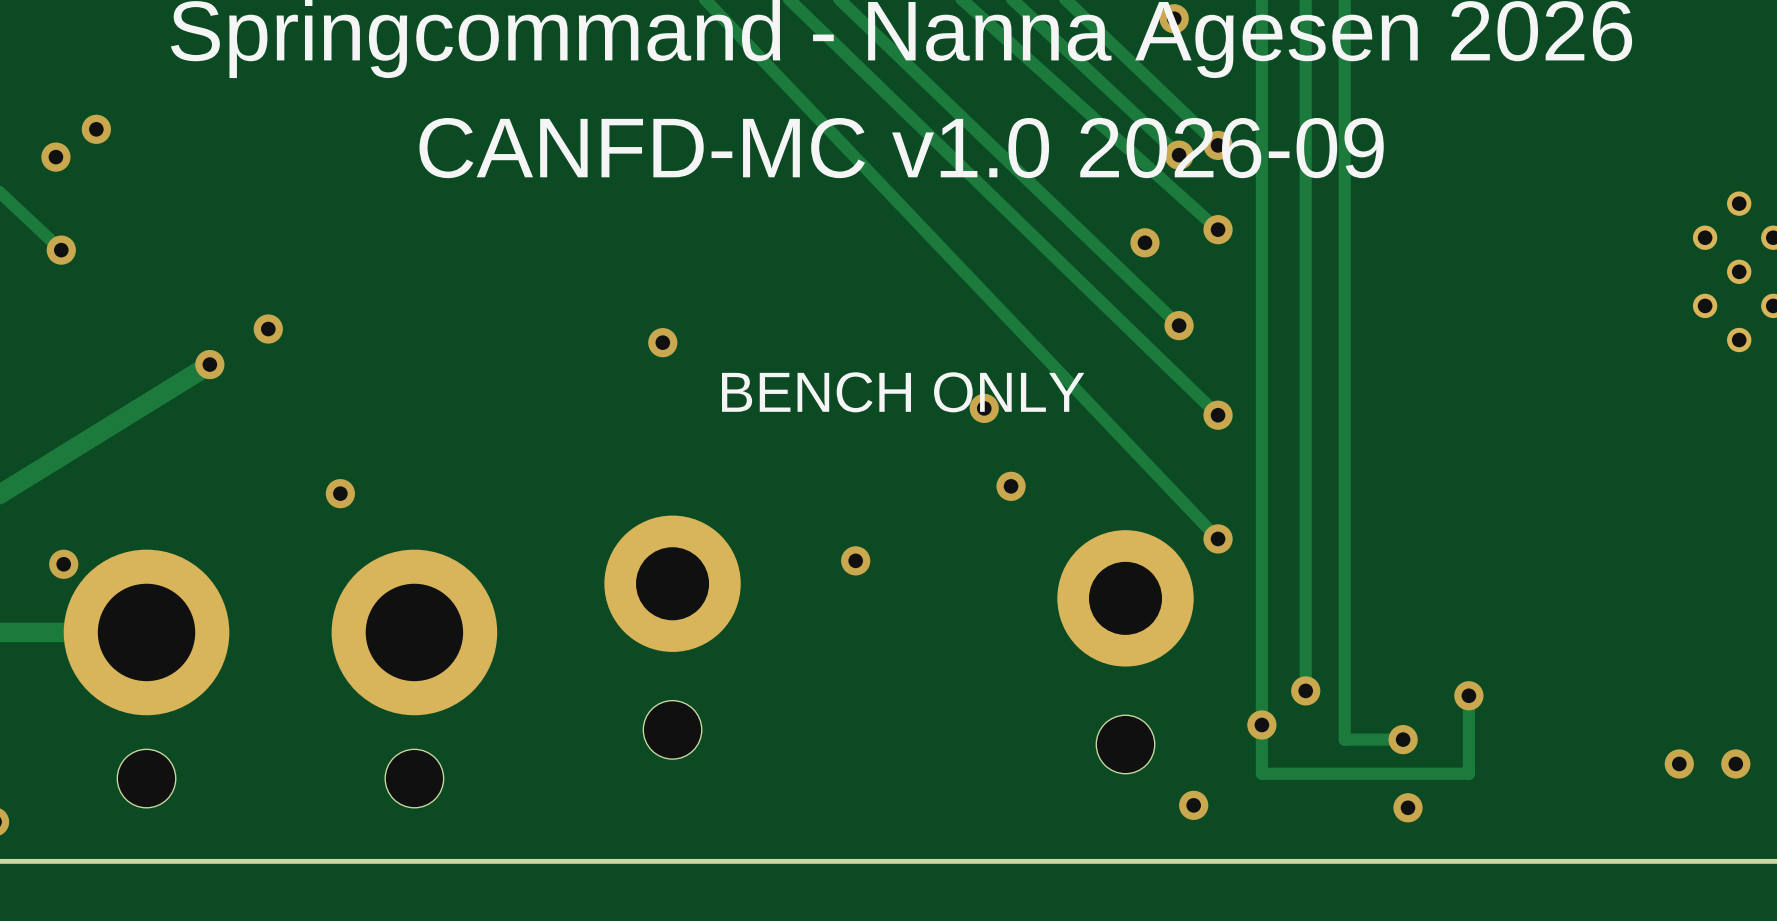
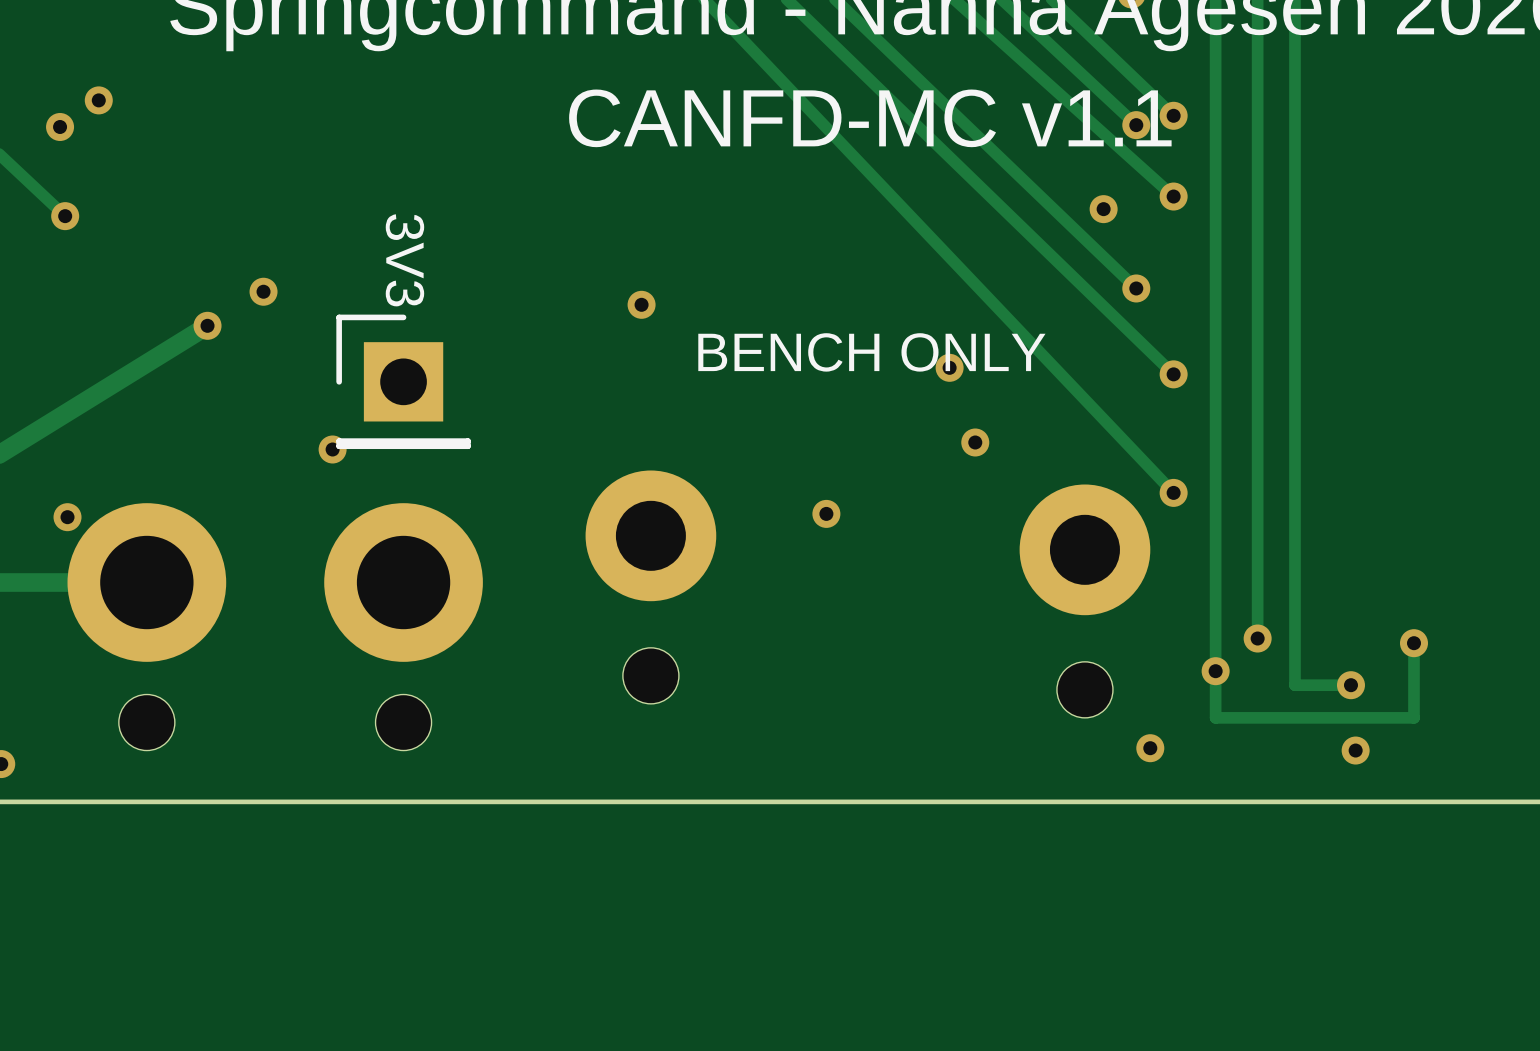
text: CANFD-MC v1.0 2026-09 (901, 148) -> CANFD-MC v1.1 (870, 118)
part: none -> 3V3 (403, 381)

